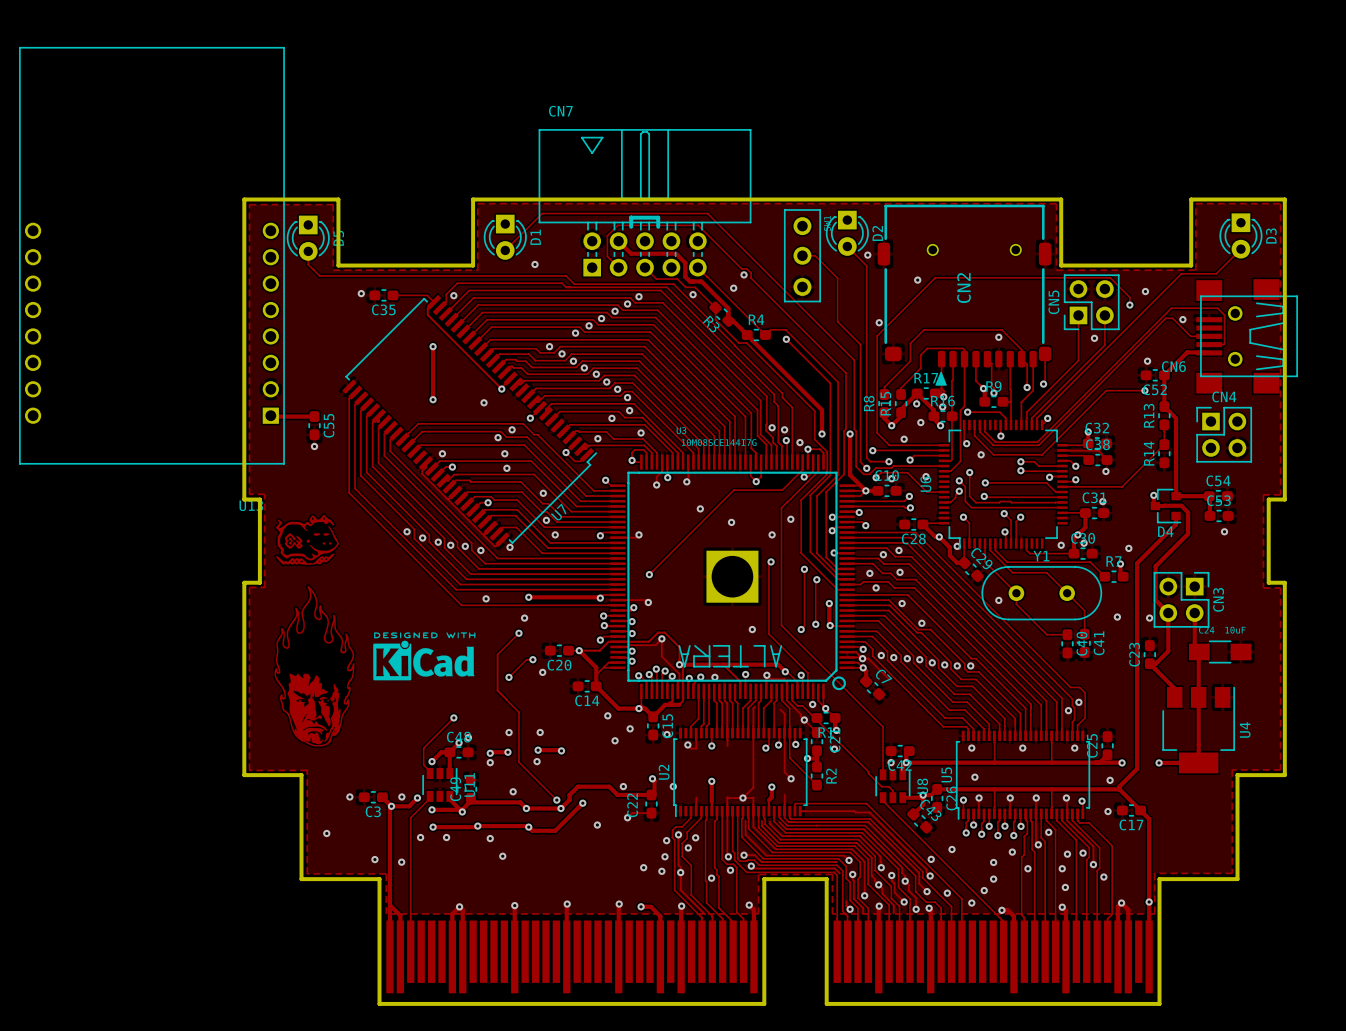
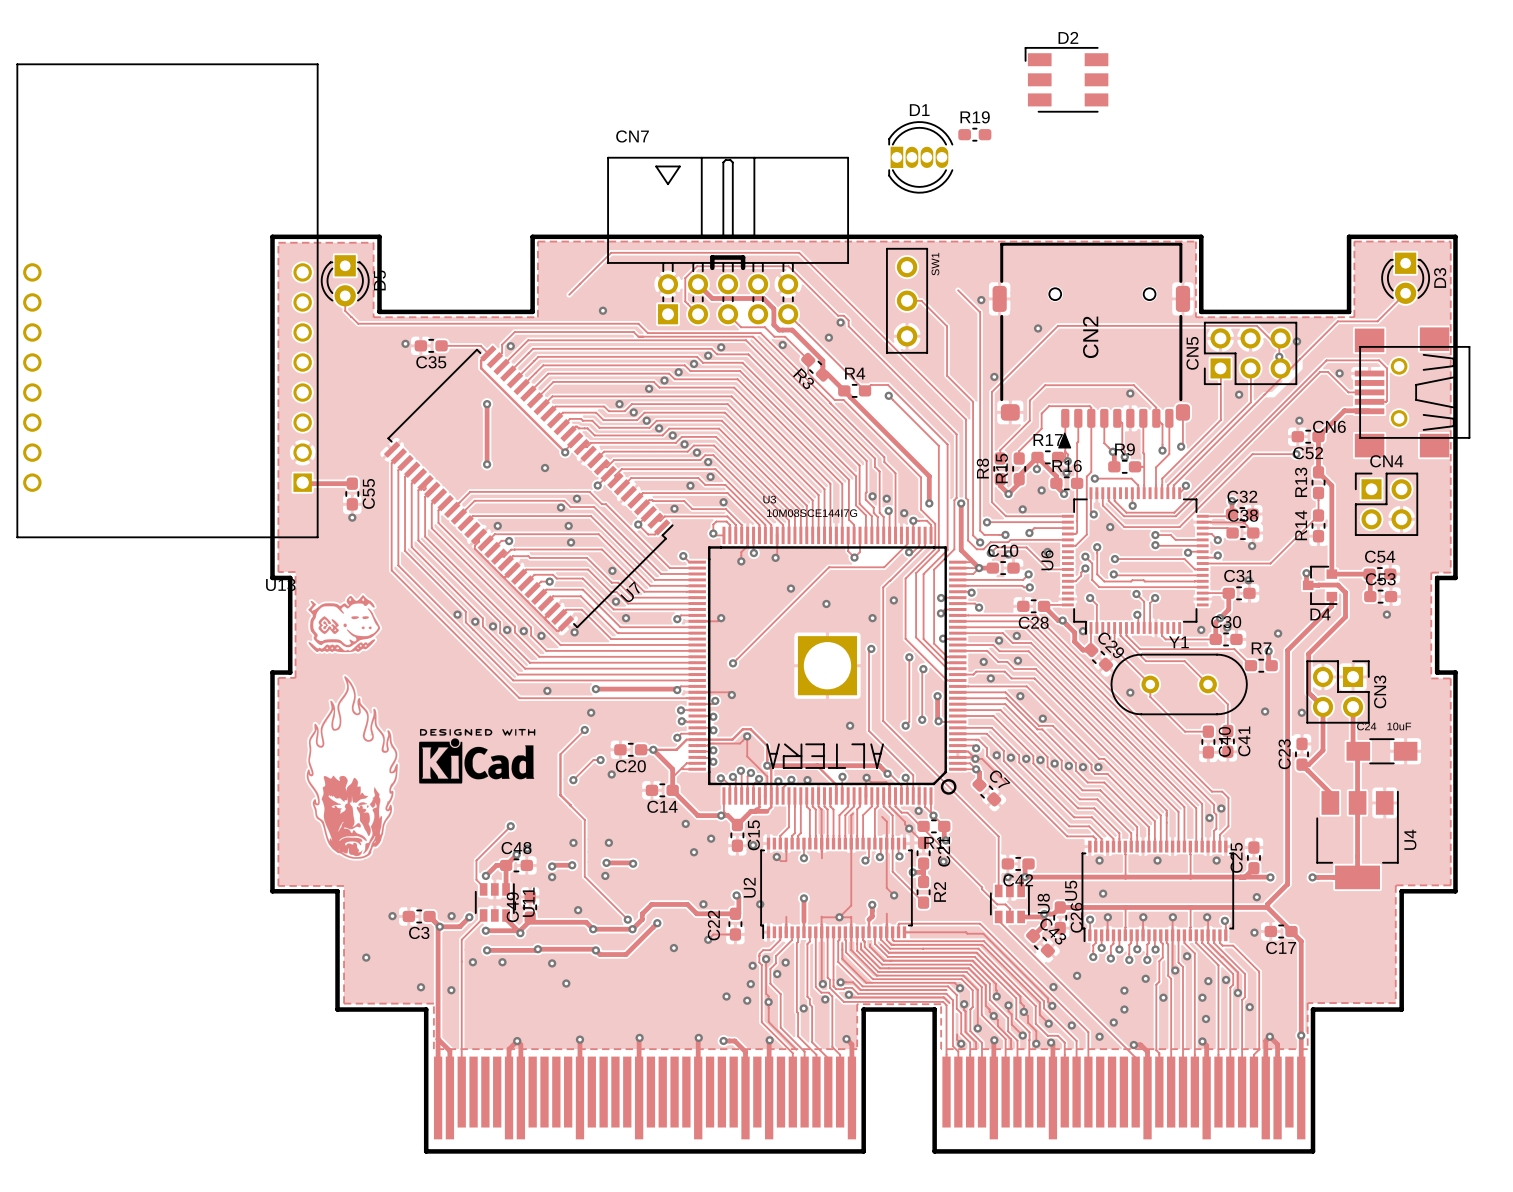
R19: none -> (974, 134)
D2 footprint: [826, 210, 869, 256] -> [1024, 47, 1109, 113]
D1 footprint: [483, 214, 527, 260] -> [888, 121, 954, 194]
D2 name position: D2 (877, 233) -> D2 (1068, 37)
D1 name position: D1 (535, 237) -> D1 (919, 110)
CN5 footprint: [1064, 274, 1120, 330] -> [1204, 321, 1298, 385]

